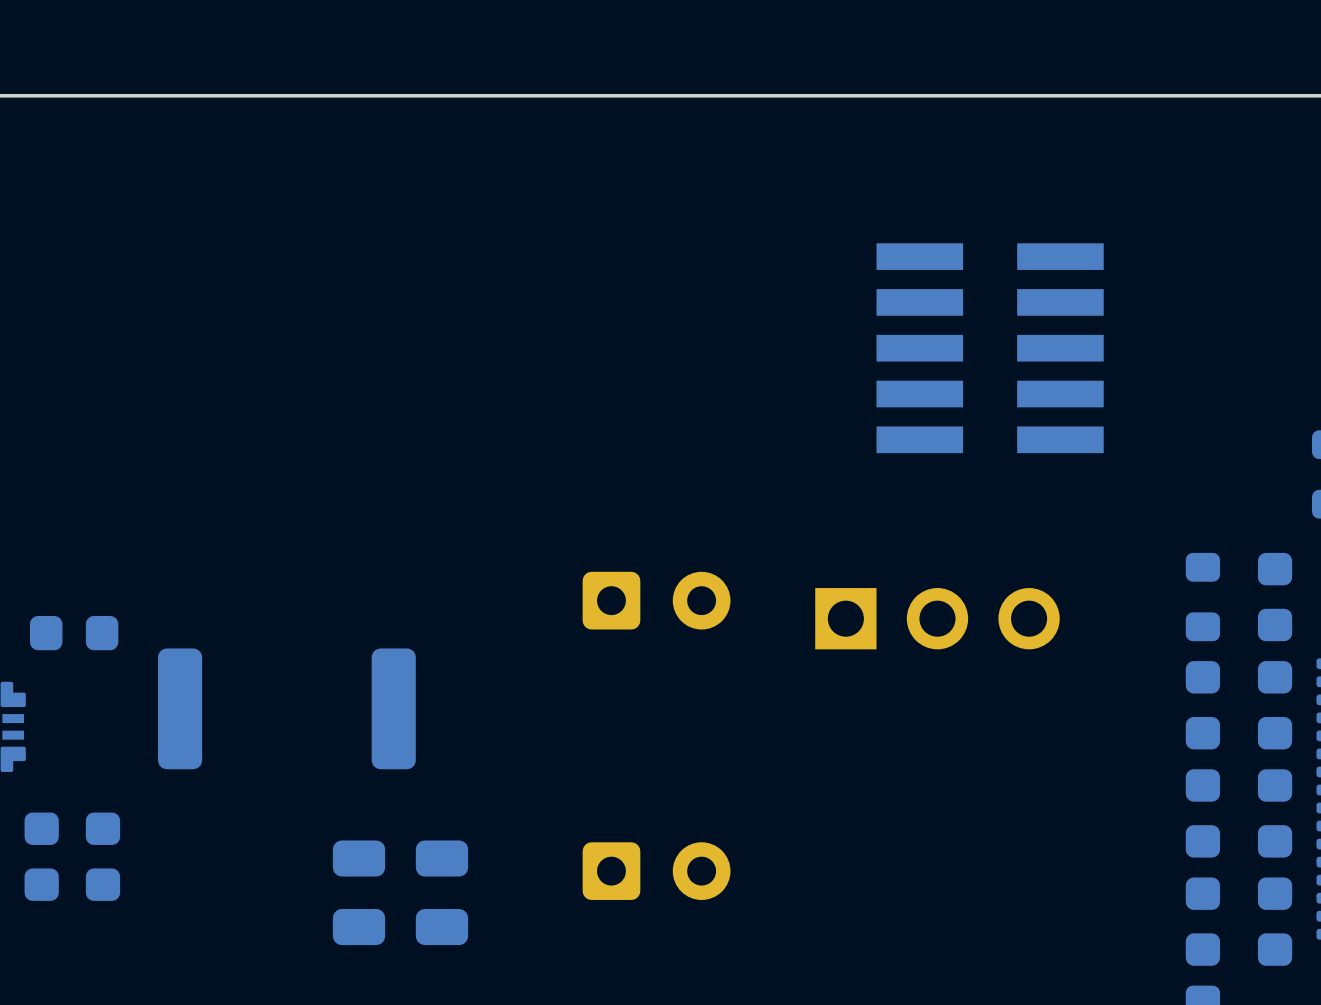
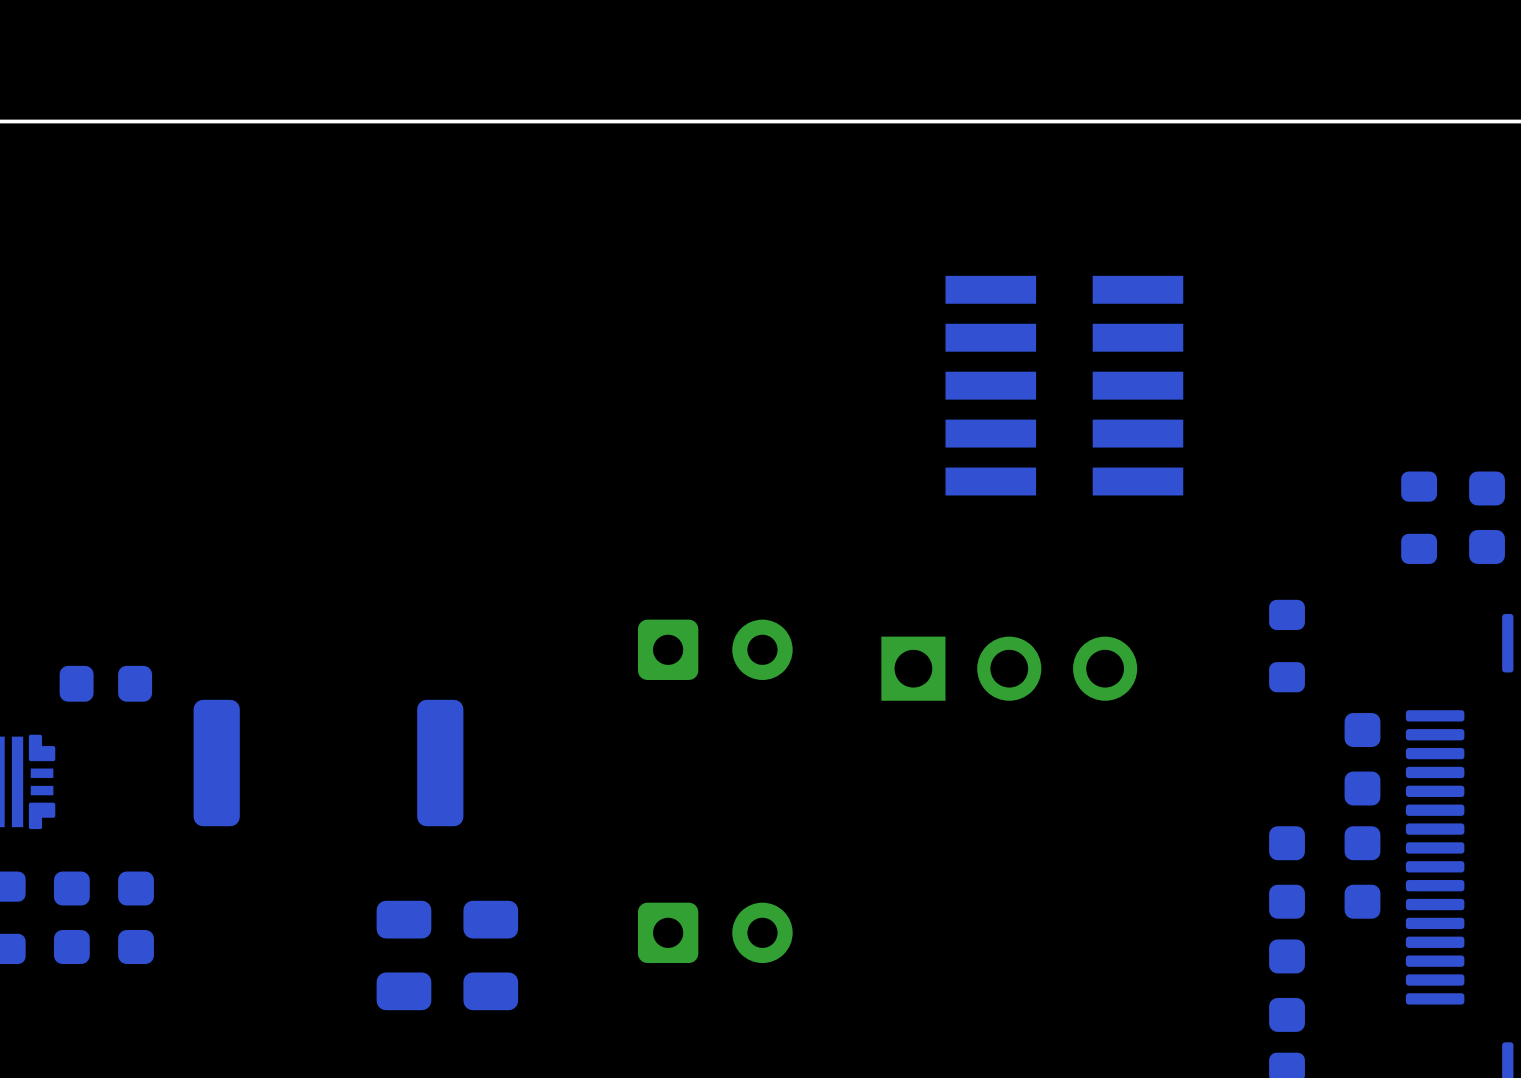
part: (1275, 597) -> none
part: (1202, 705) -> none
part: (1275, 921) -> none

